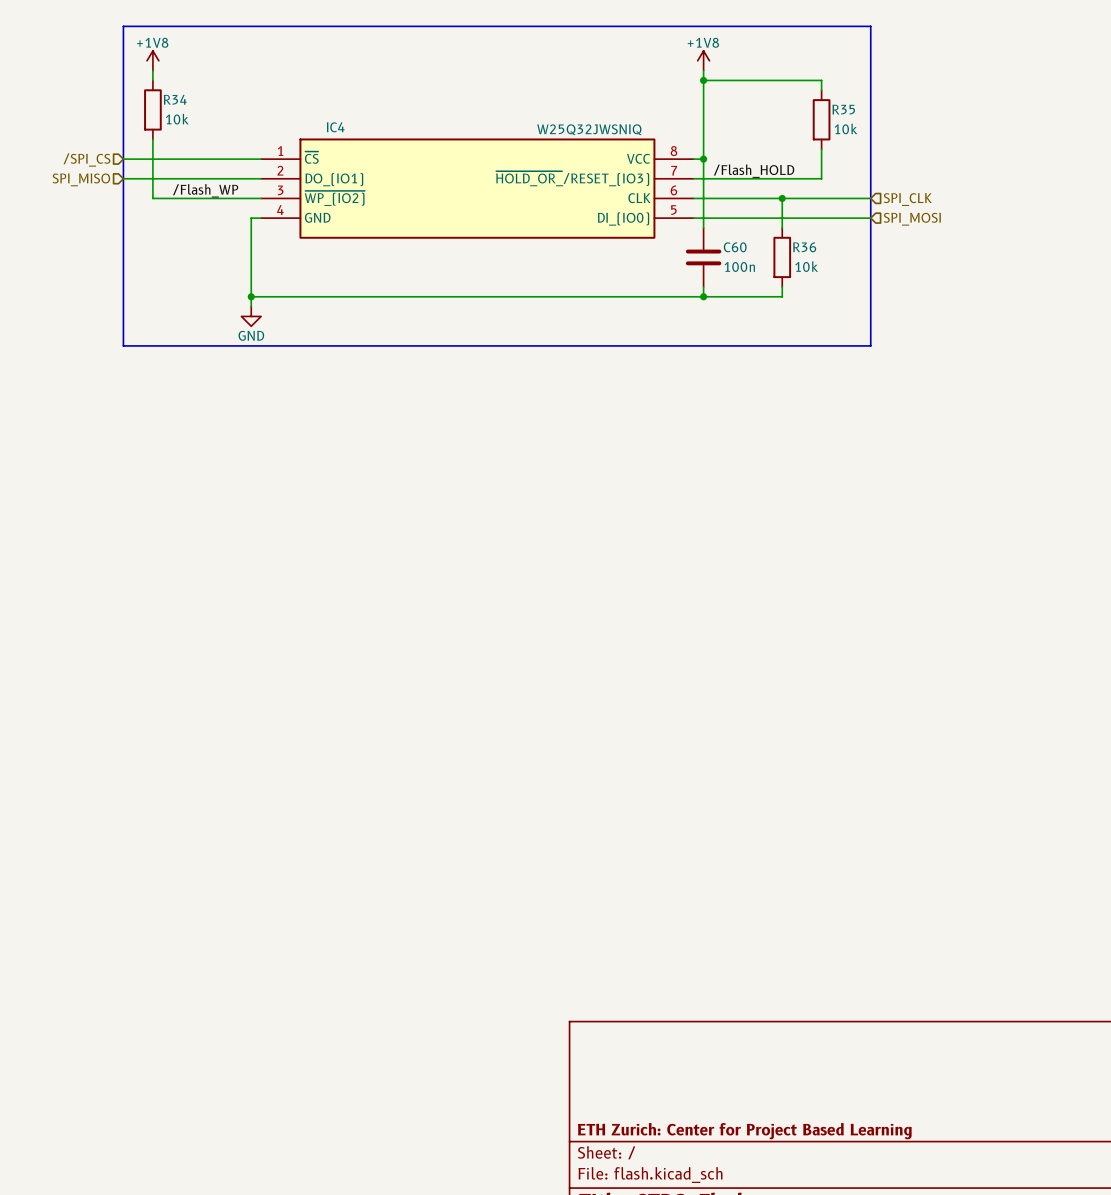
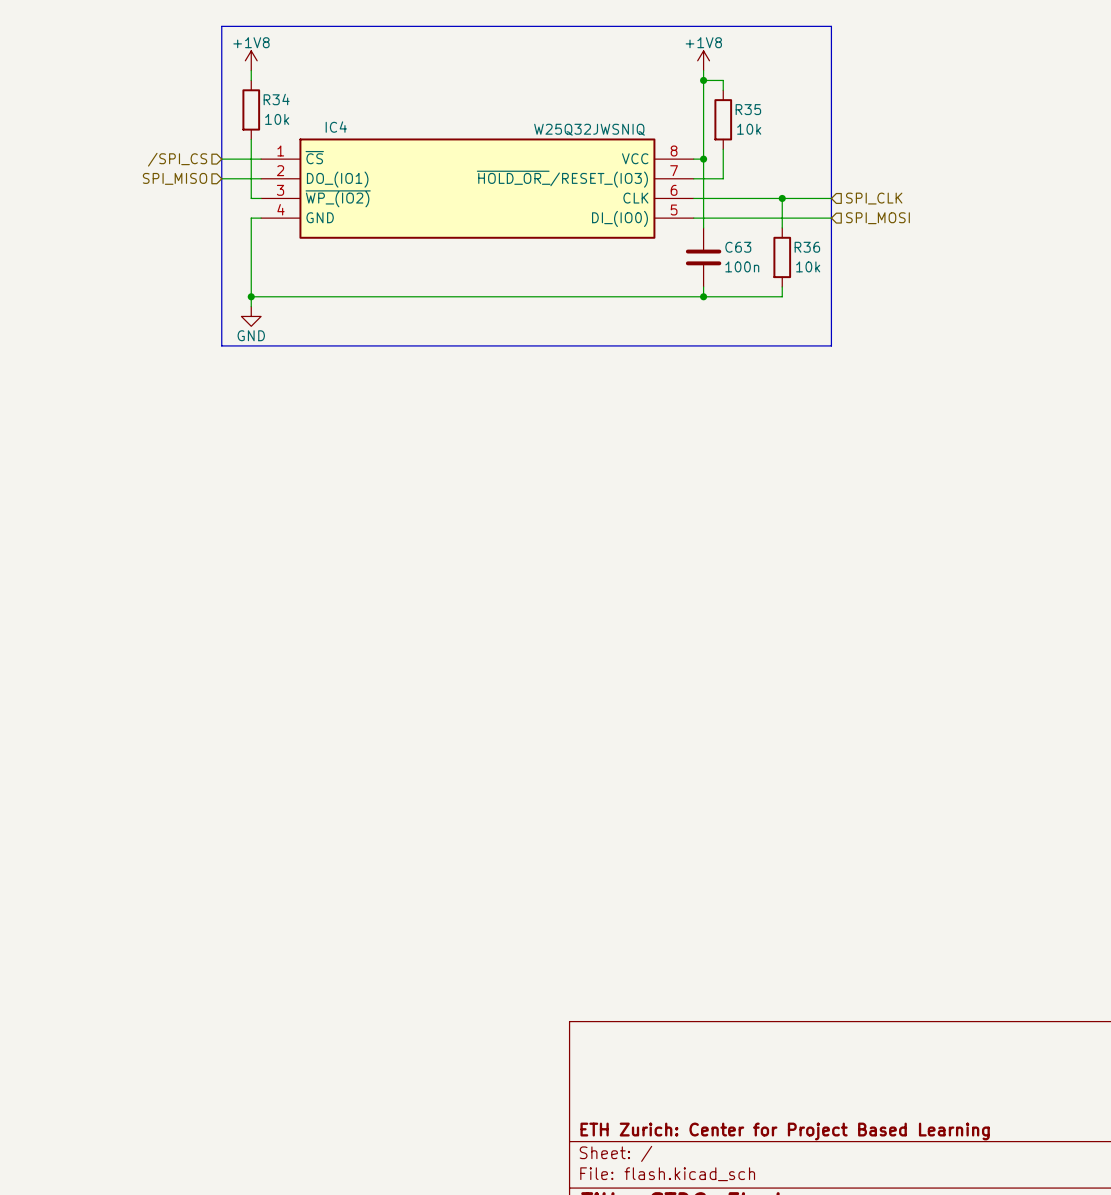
line: (221, 26) (123, 26) (123, 345) (221, 345) -> (221, 26) (221, 345)
line: (831, 26) (870, 26) (870, 345) (831, 345) -> (831, 26) (831, 345)
power symbol position: +1V8 (152, 60) -> +1V8 (251, 60)
wire: (152, 70) (152, 80) -> (251, 70) (251, 80)
wire: (723, 80) (821, 80) (821, 90) -> (723, 80) (723, 90)
R34 position: (152, 109) -> (251, 109)
R35 position: (821, 119) -> (723, 119)
wire: (152, 139) (152, 198) (251, 198) -> (251, 139) (251, 198)
wire: (821, 149) (821, 178) (723, 178) -> (723, 149) (723, 178)
hierarchical label position: /SPI_CS (86, 159) -> /SPI_CS (177, 159)
wire: (123, 159) (221, 159) -> none
label: /Flash_HOLD (754, 171) -> none
wire: (123, 178) (221, 178) -> none
hierarchical label position: SPI_MISO (81, 179) -> SPI_MISO (175, 178)
label: /Flash_WP (205, 190) -> none
wire: (831, 198) (870, 198) -> none
hierarchical label position: SPI_CLK (907, 199) -> SPI_CLK (874, 198)
wire: (831, 218) (870, 218) -> none
hierarchical label position: SPI_MOSI (912, 219) -> SPI_MOSI (877, 218)
C60 name: C60 (735, 247) -> C63 (738, 247)

